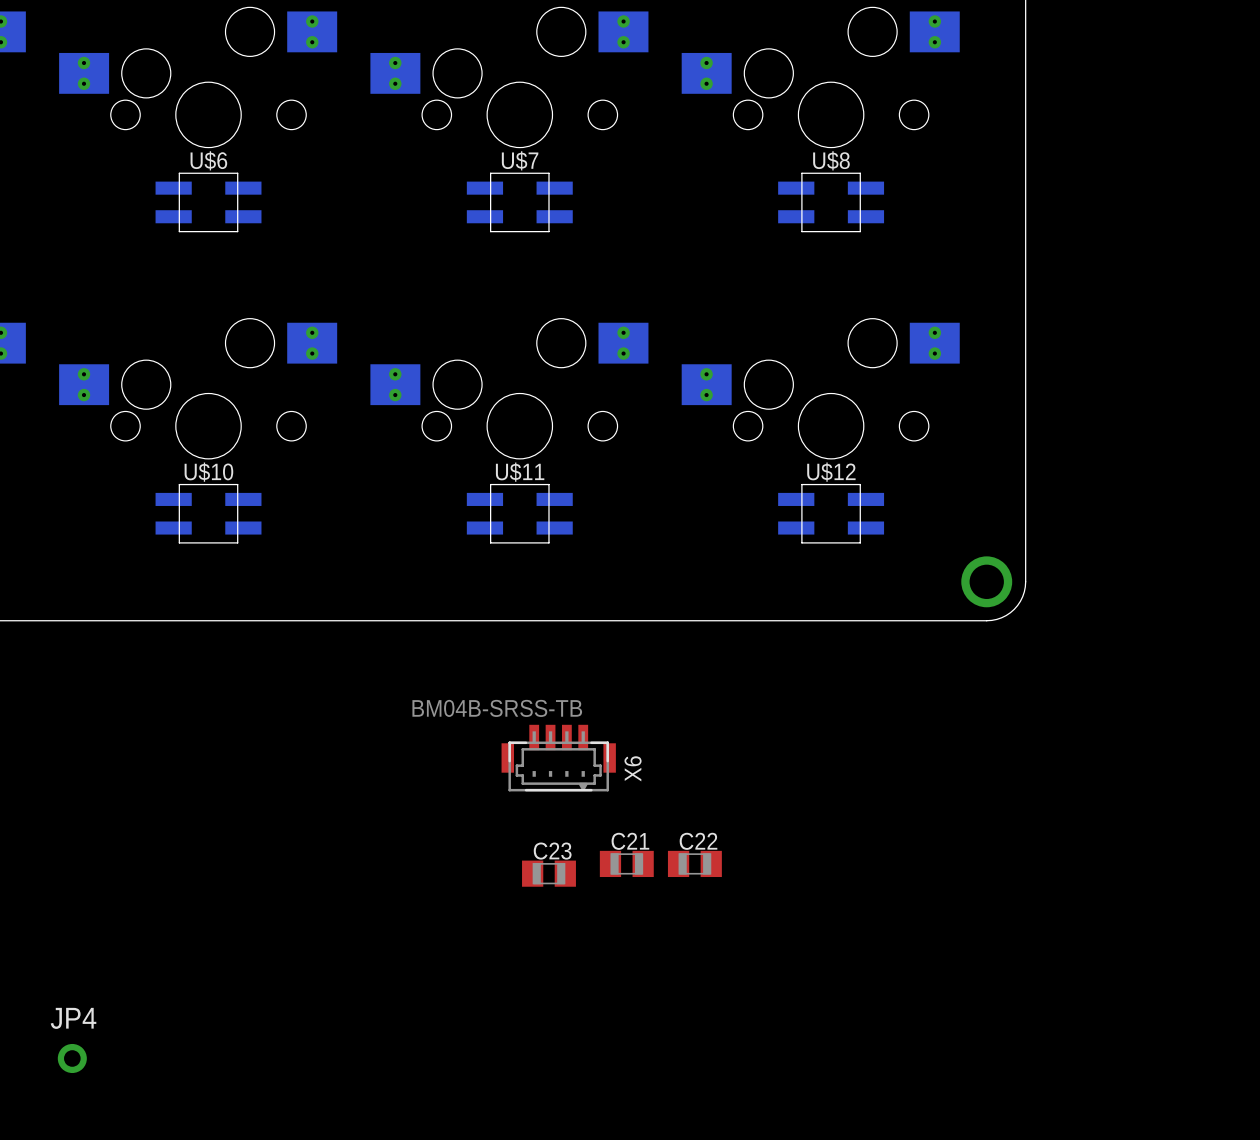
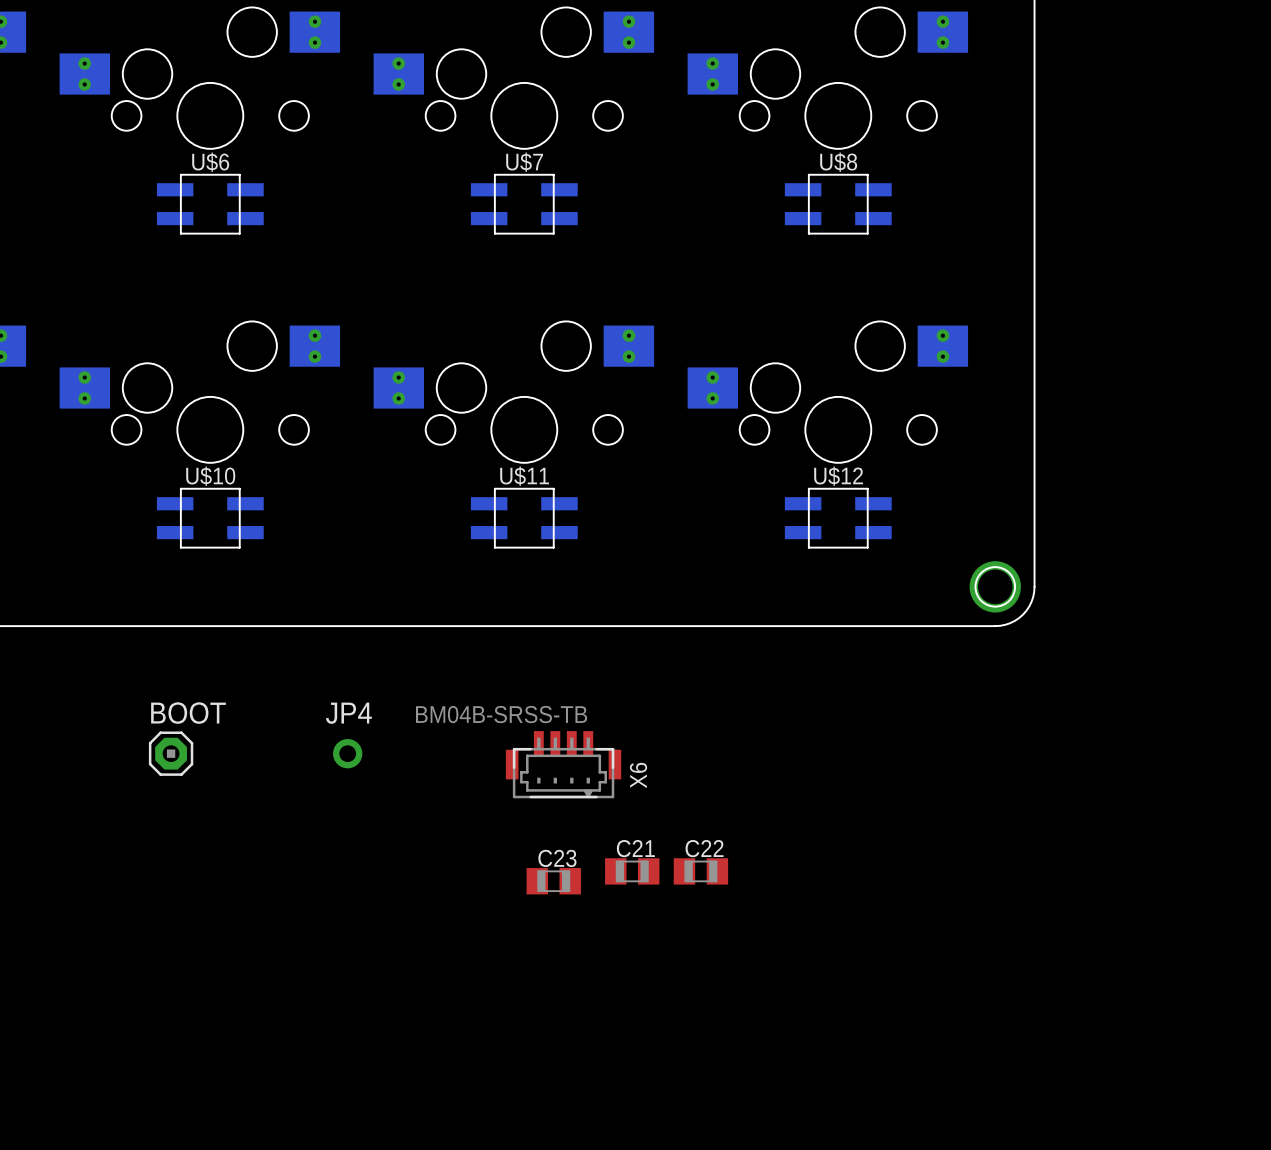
round board edge: none -> [974, 566, 1016, 608]
BOOT: none -> (171, 753)
JP4 position: (72, 1058) -> (347, 753)

